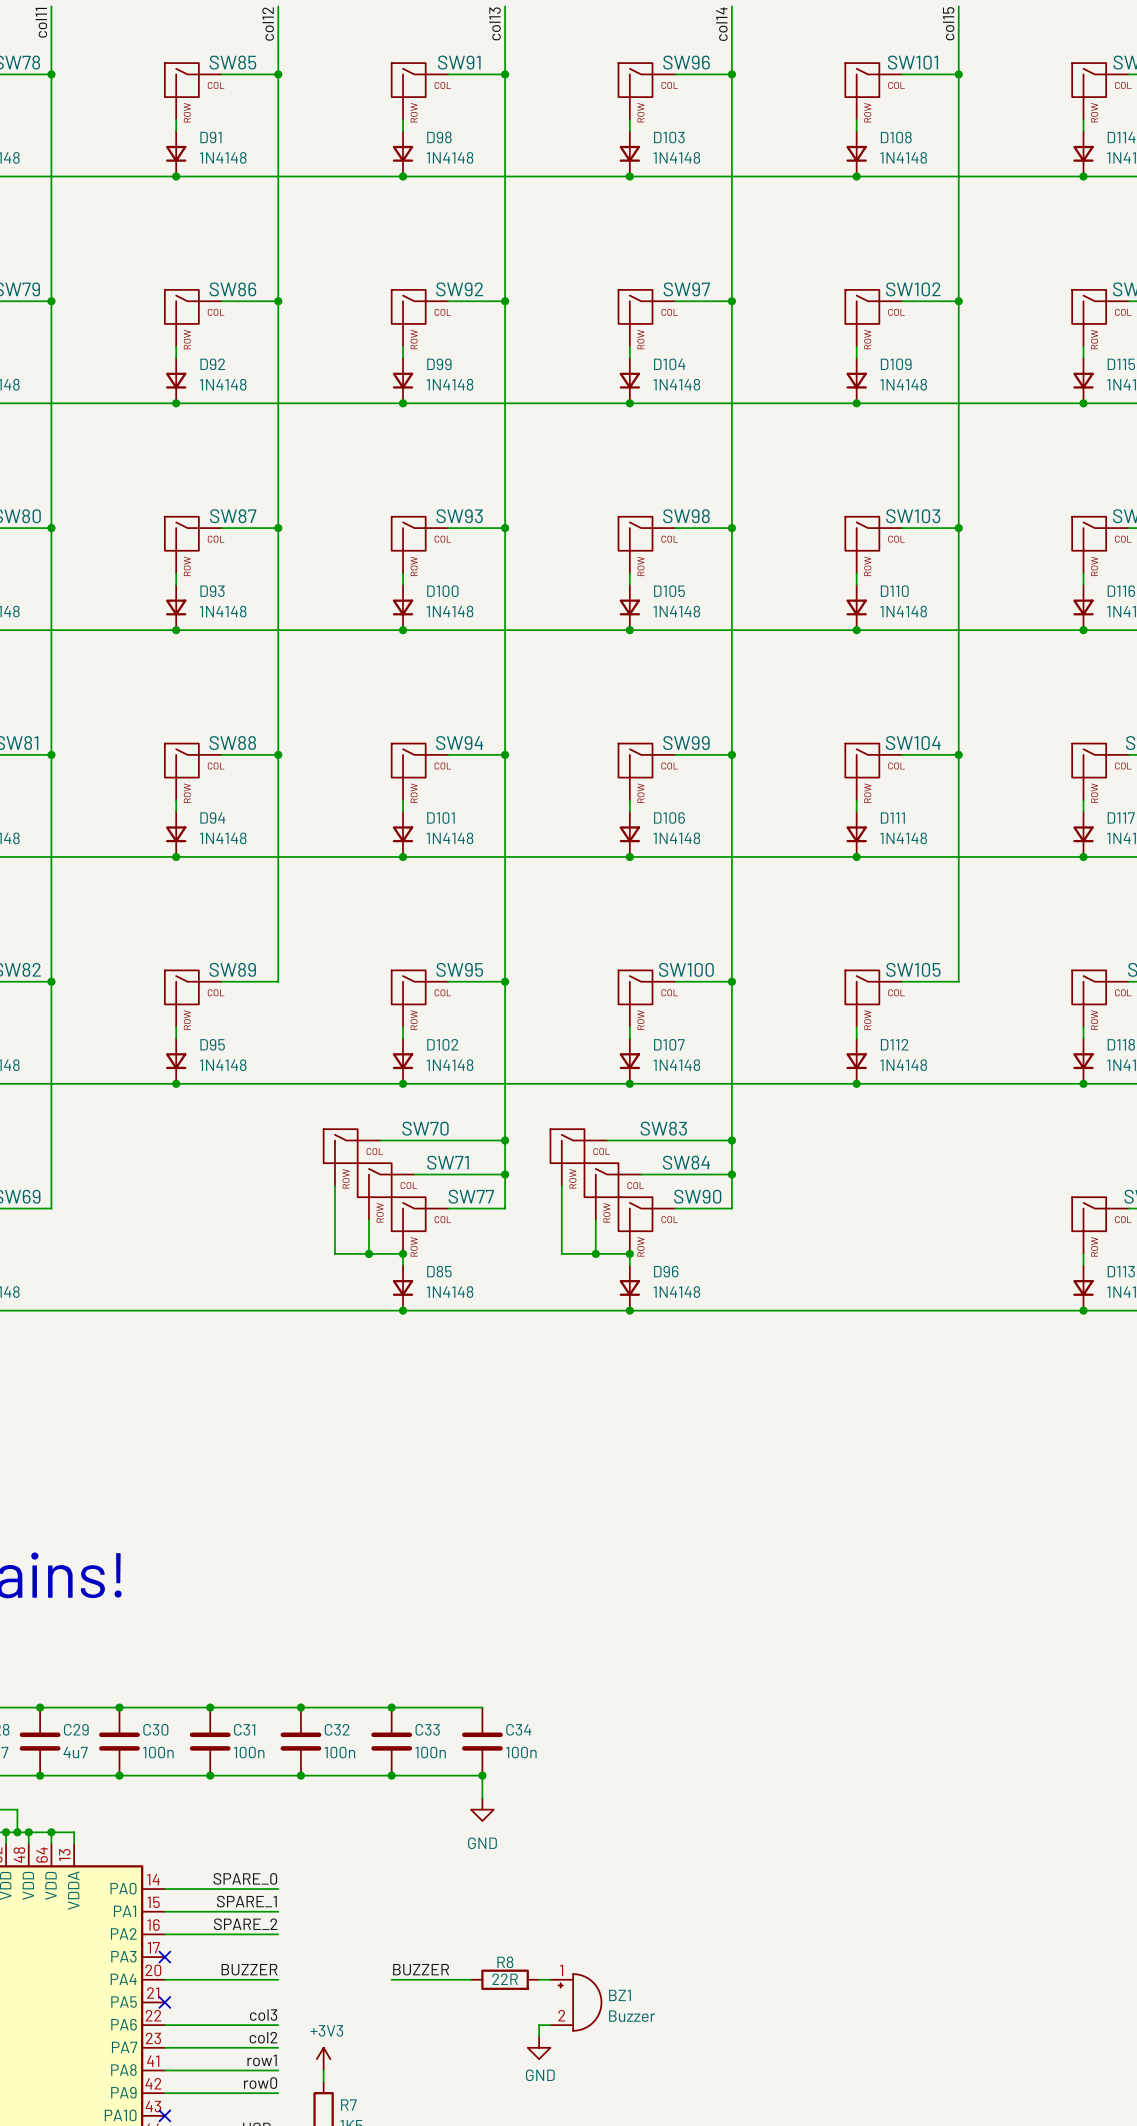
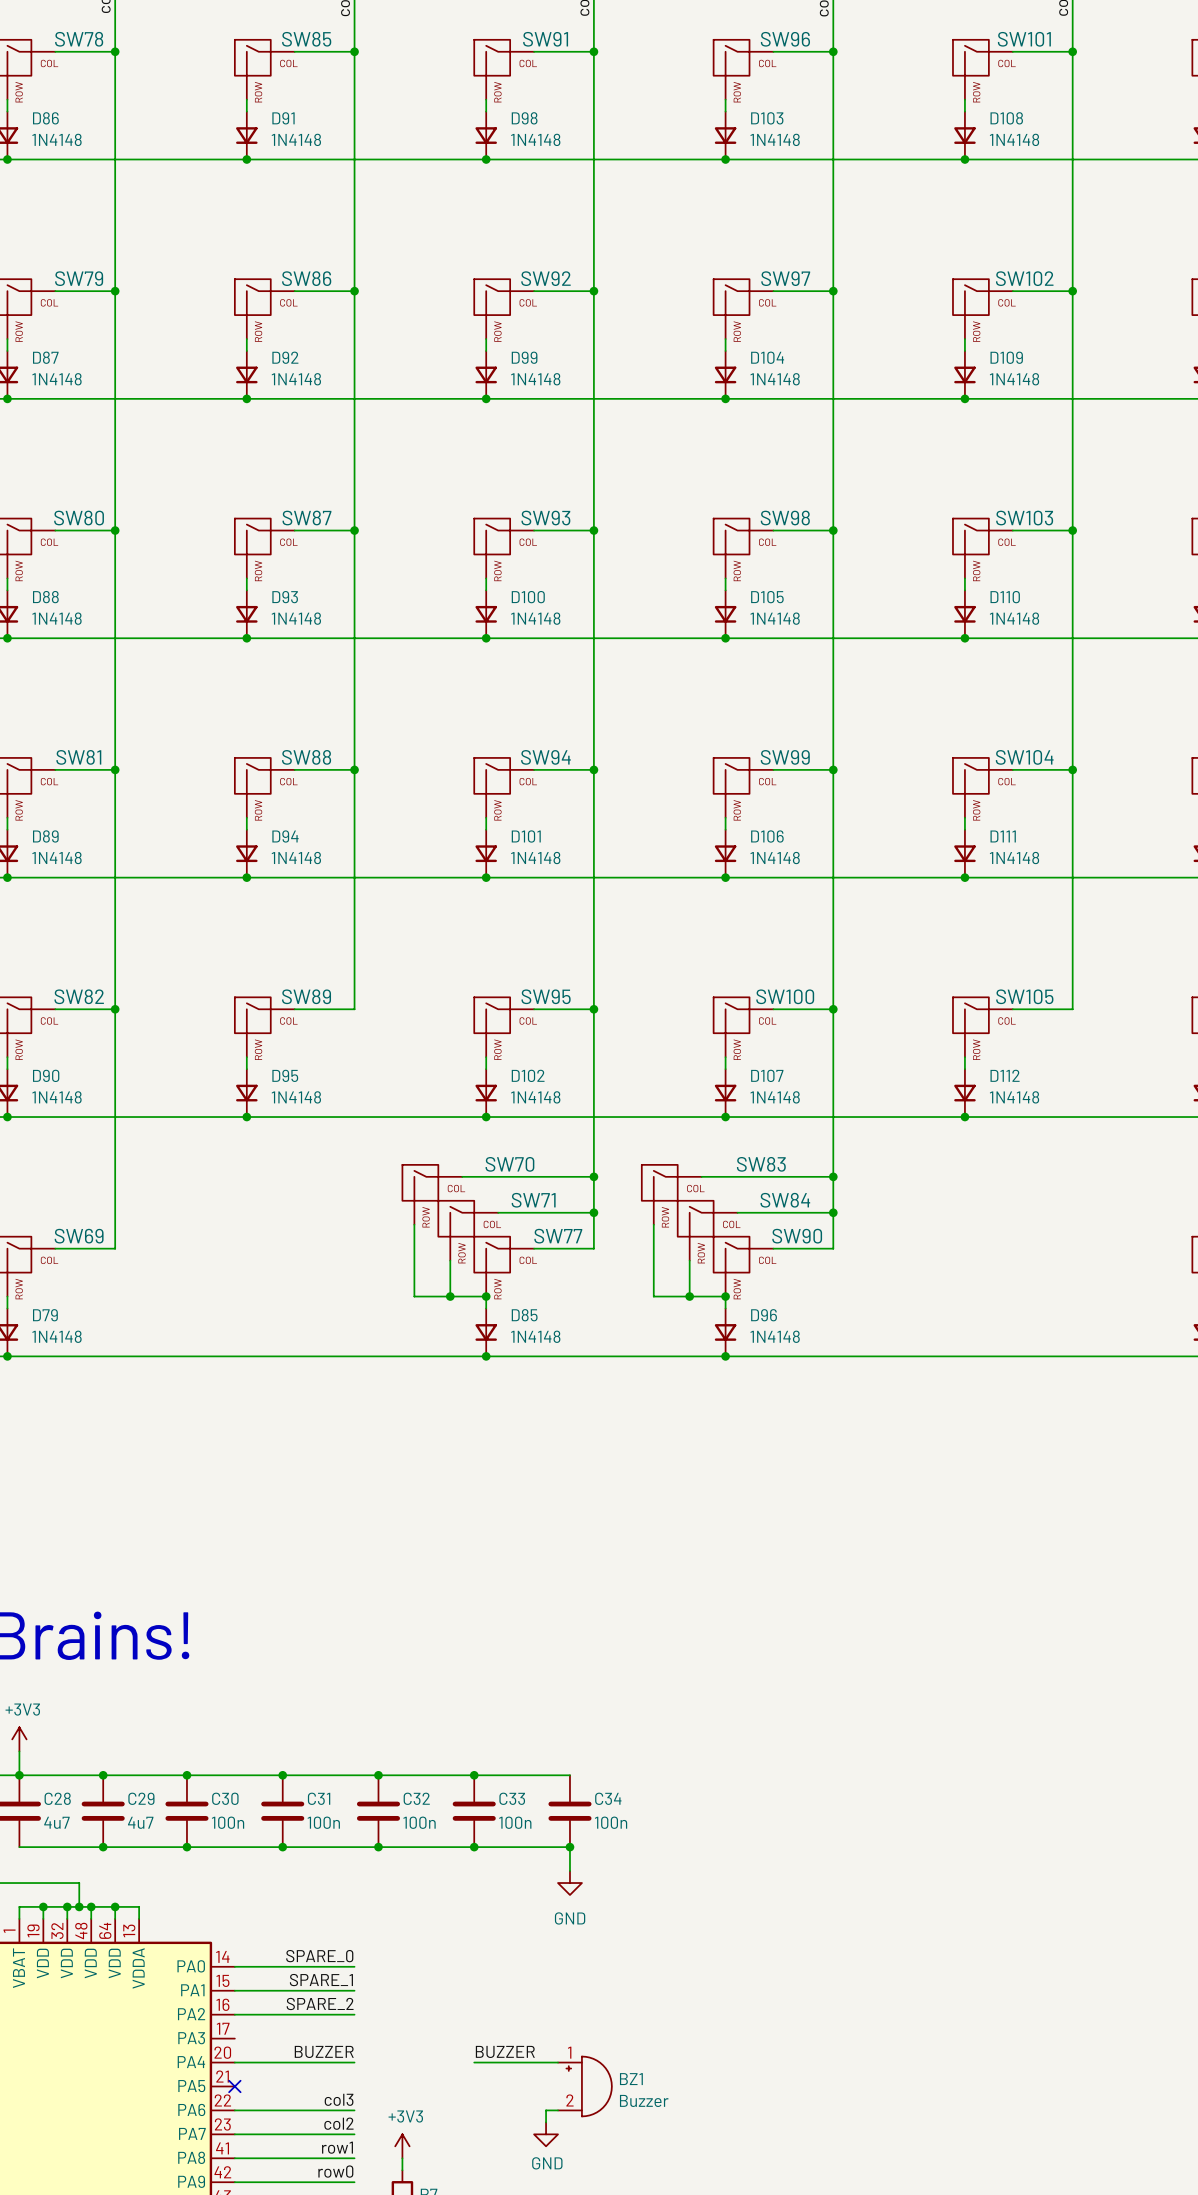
no-connect mark: (164, 1957) -> none
R8: 22R (505, 1979) -> none
wire: (539, 1979) (550, 1979) -> none
BZ1 position: (575, 2002) -> (584, 2086)
wire: (550, 2025) (539, 2025) (539, 2036) -> (558, 2110) (546, 2110) (546, 2122)
power symbol position: GND (539, 2047) -> GND (546, 2134)

